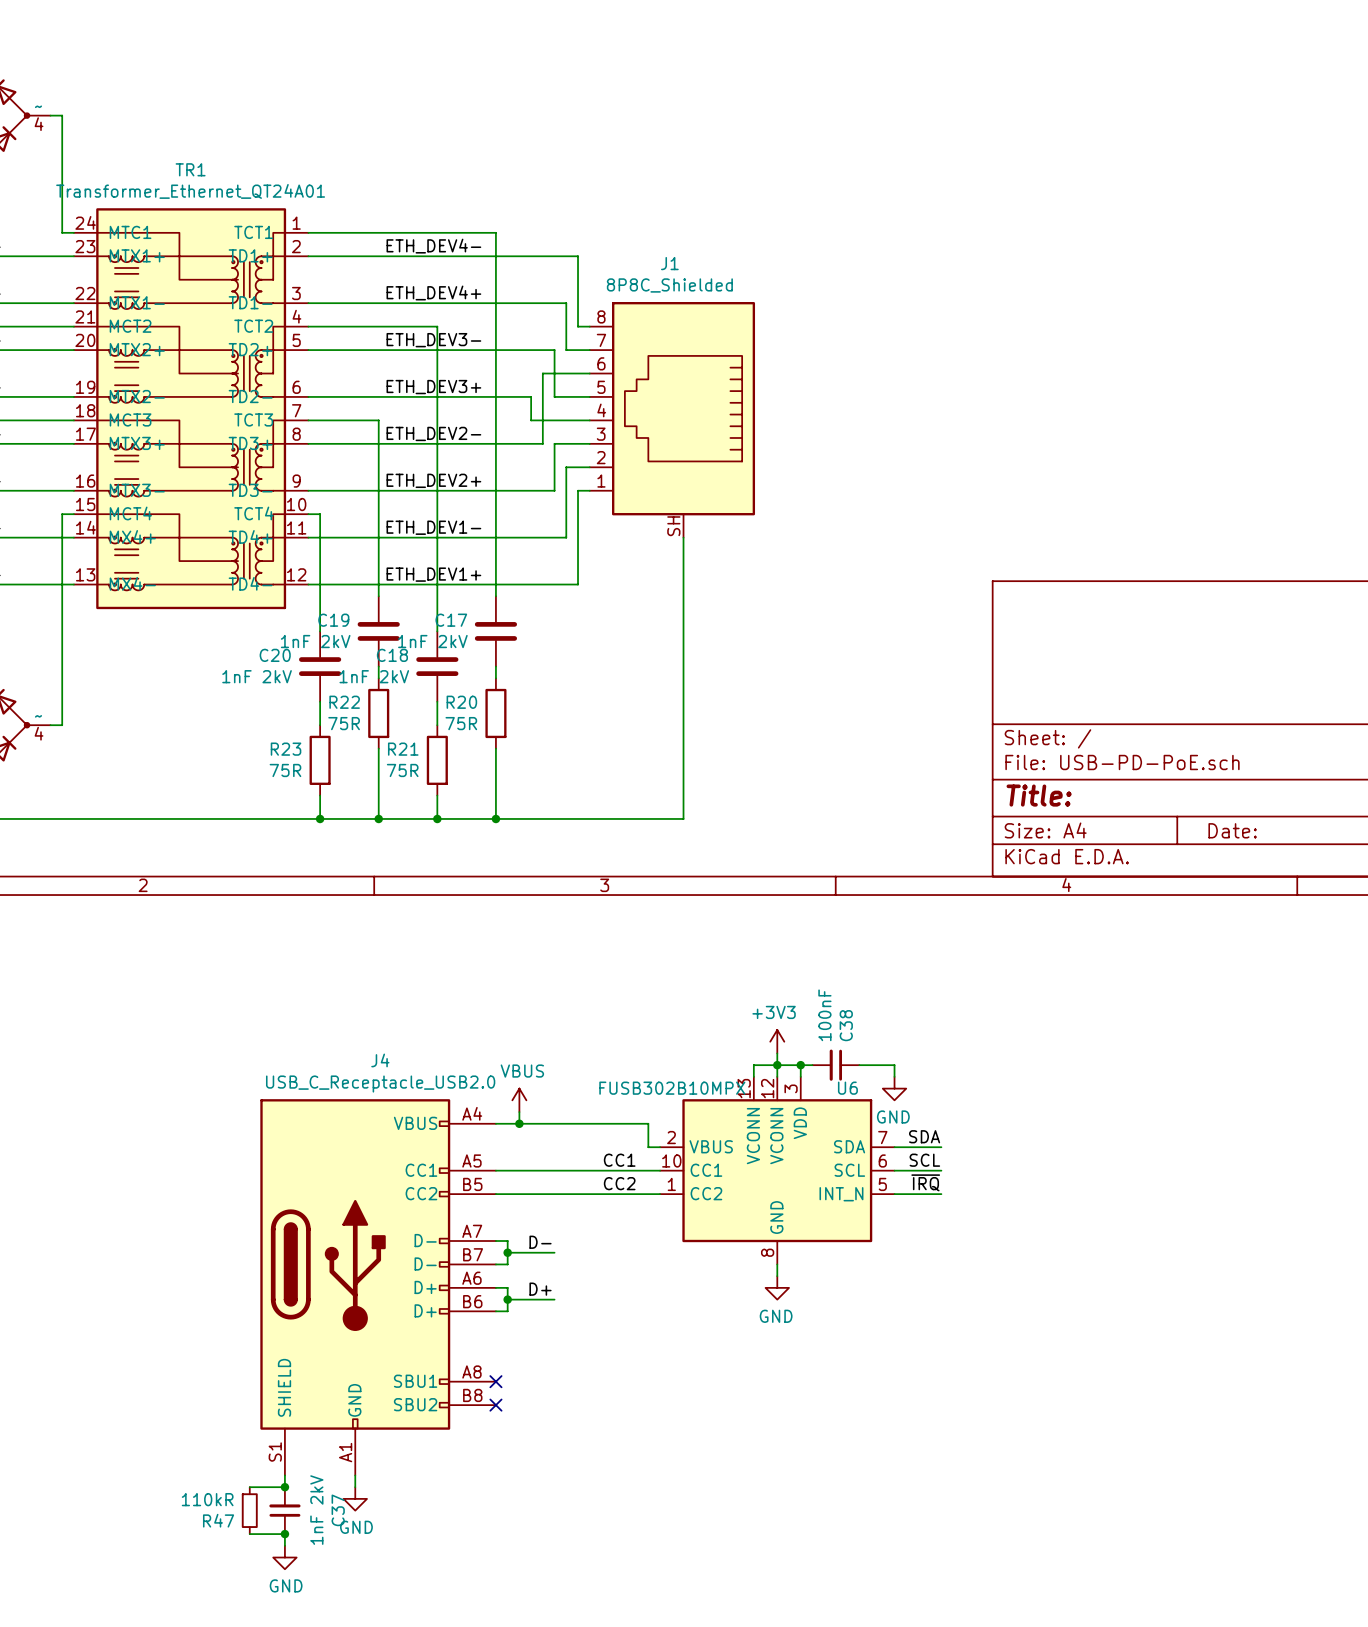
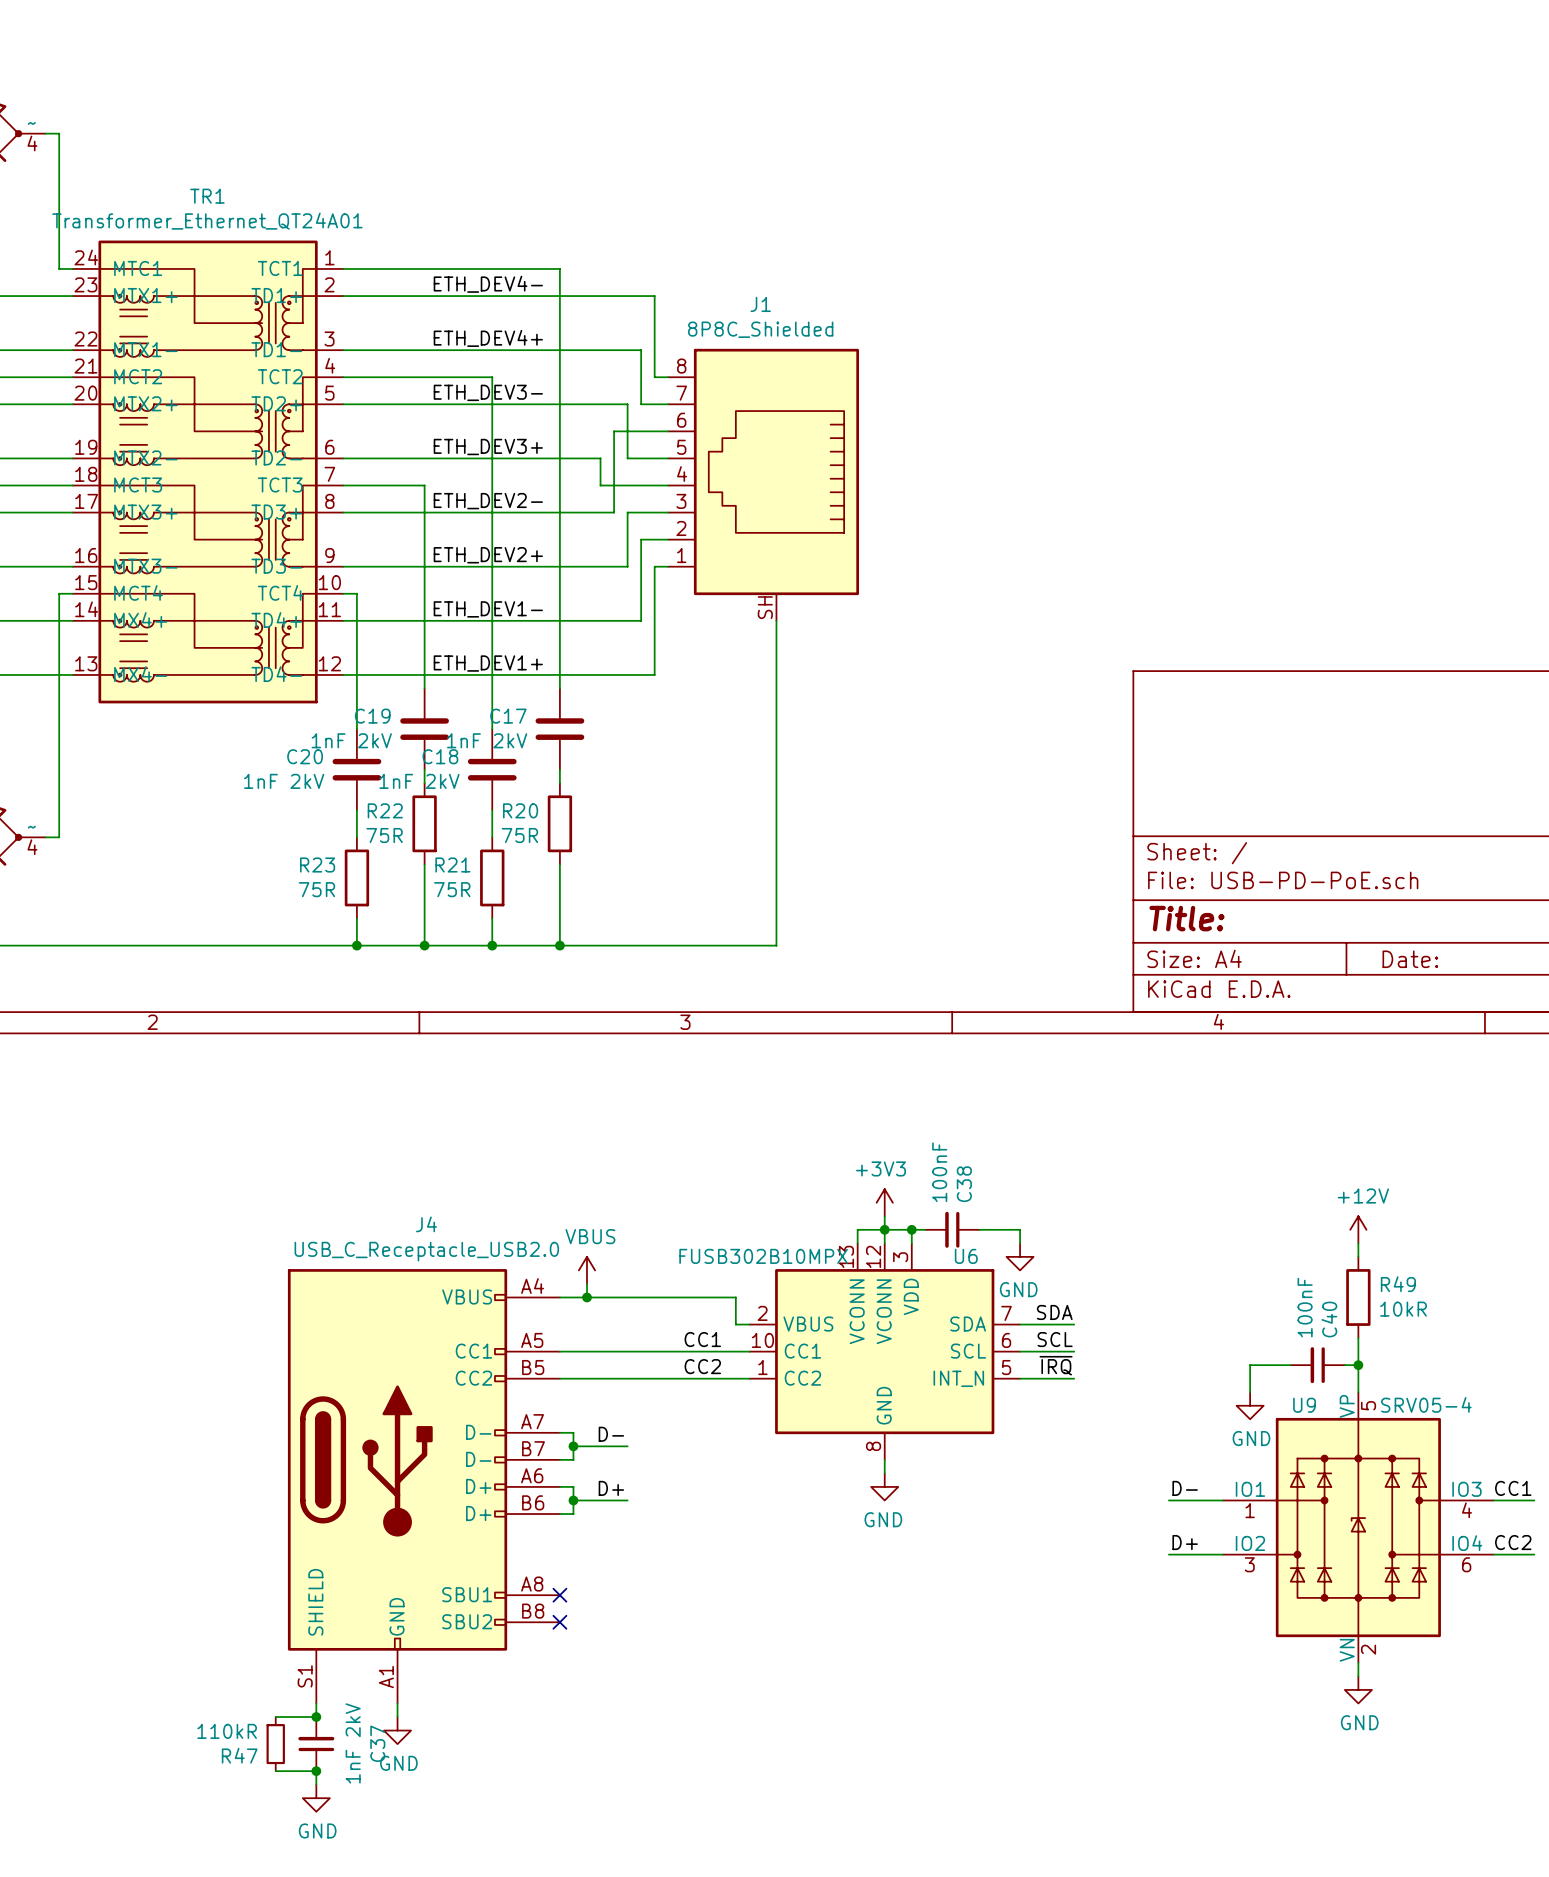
power symbol: none -> +12V (1358, 1229)
wire: none -> (1358, 1243) (1358, 1256)
R49: none -> 10kR (1358, 1297)
wire: none -> (1358, 1338) (1358, 1392)
wire: none -> (1290, 1365) (1250, 1365) (1250, 1392)
C40: none -> 100nF (1317, 1365)
wire: none -> (1344, 1365) (1358, 1365)
junction: none -> (1358, 1365)
power symbol: none -> GND (1250, 1405)
label: none -> D- (1185, 1488)
label: none -> CC1 (1513, 1488)
wire: none -> (1168, 1500) (1223, 1500)
wire: none -> (1493, 1500) (1534, 1500)
U9: none -> SRV05-4 (1358, 1527)
label: none -> D+ (1185, 1542)
label: none -> CC2 (1513, 1542)
wire: none -> (1168, 1554) (1223, 1554)
wire: none -> (1493, 1554) (1534, 1554)
wire: none -> (1358, 1662) (1358, 1676)
power symbol: none -> GND (1358, 1689)

